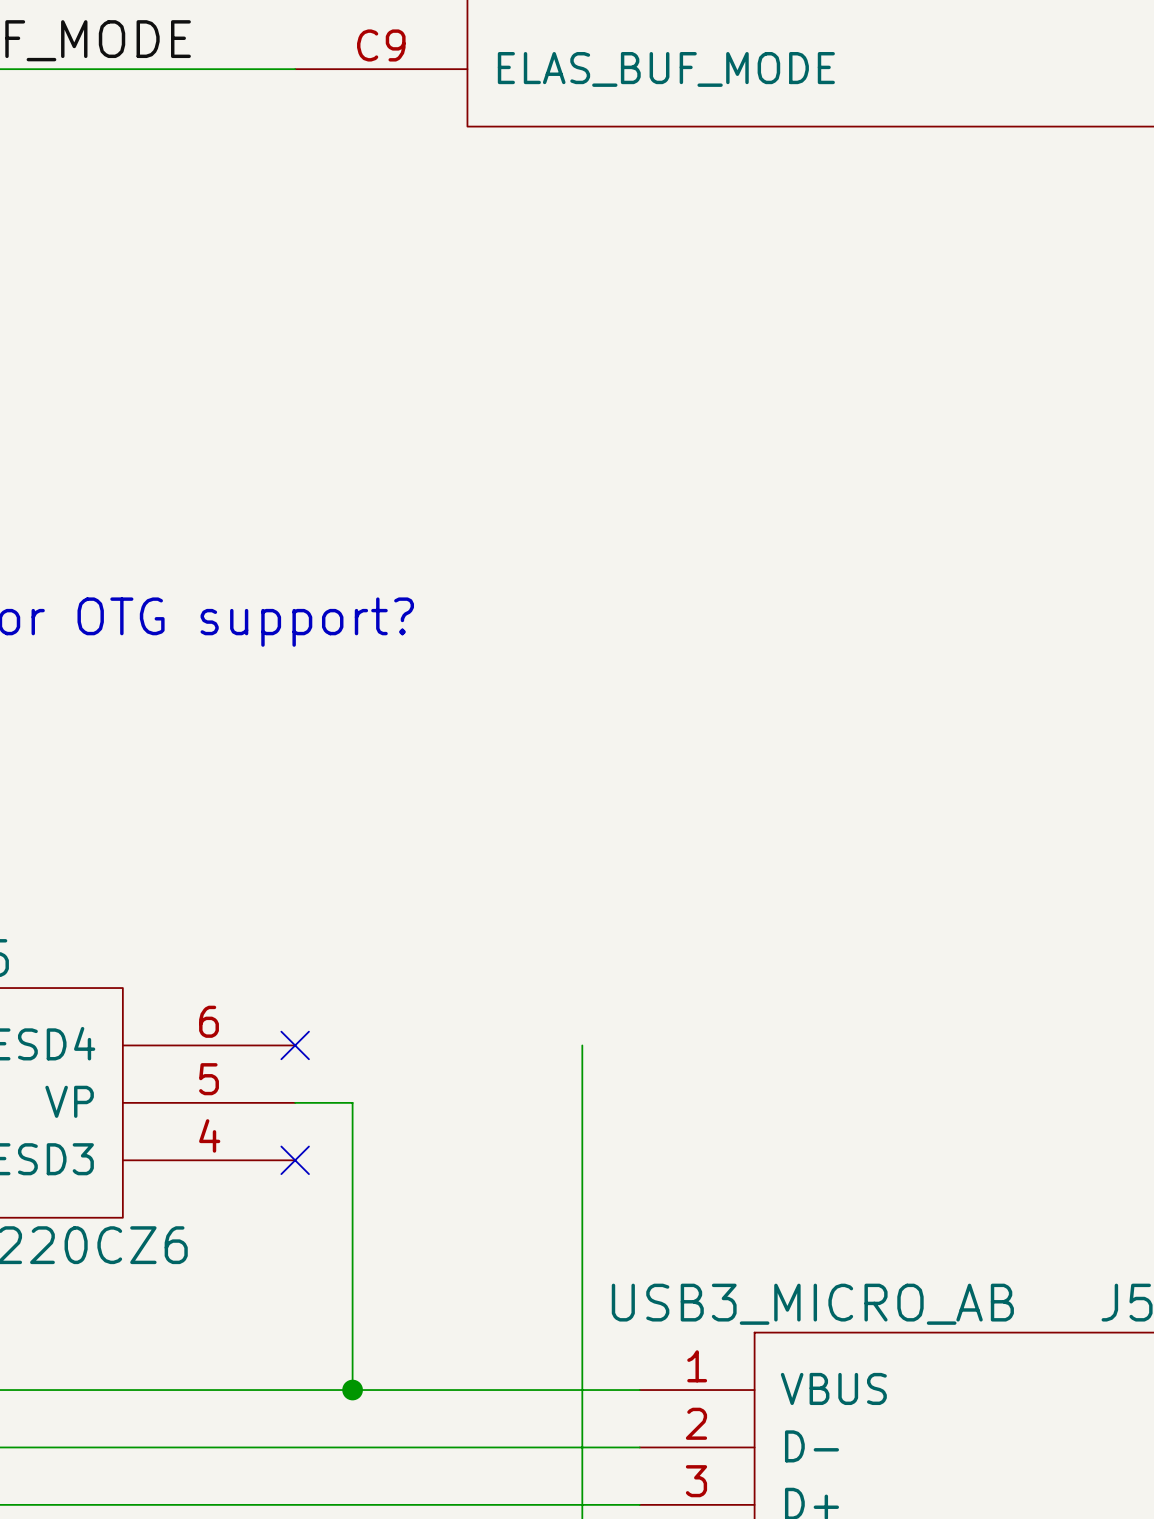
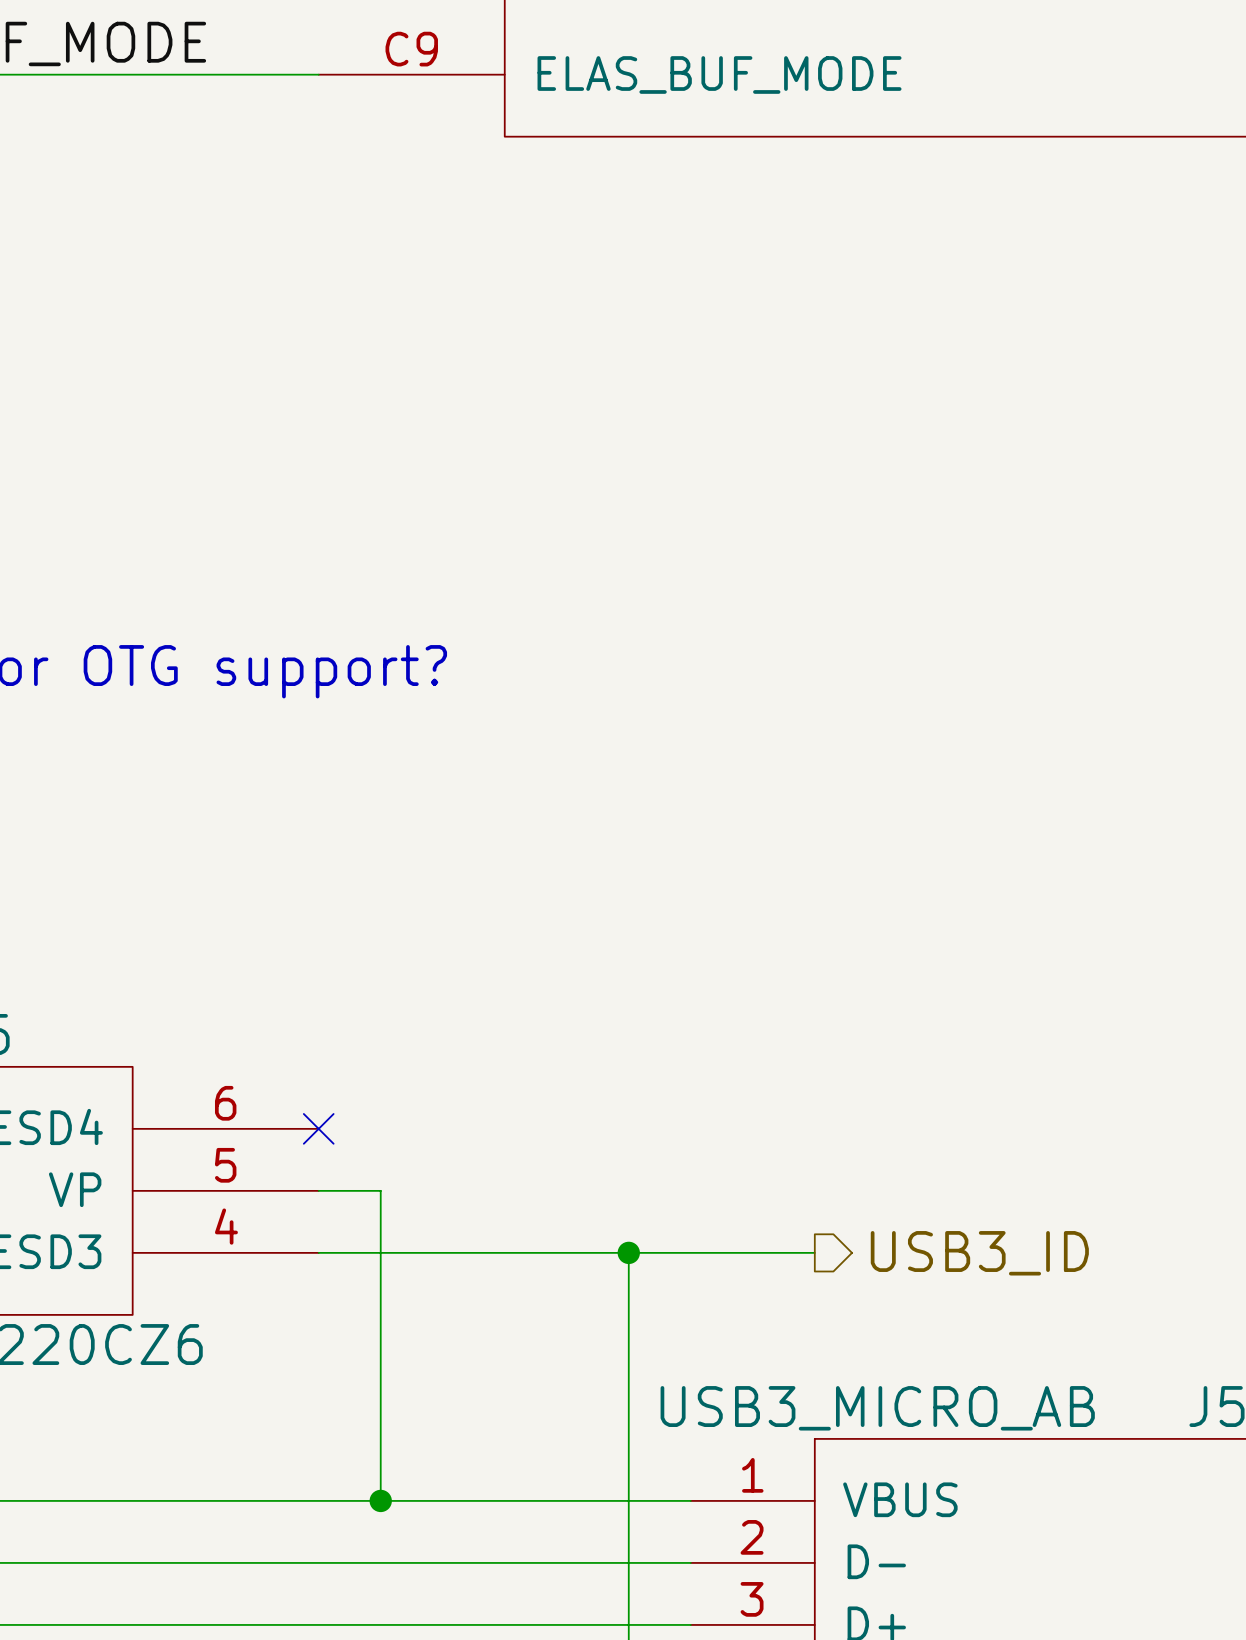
wire: (582, 1045) (582, 1160) -> none
wire: none -> (318, 1252) (814, 1252)
no-connect mark: (295, 1160) -> none
junction: none -> (628, 1252)
hierarchical label: none -> USB3_ID (979, 1253)

